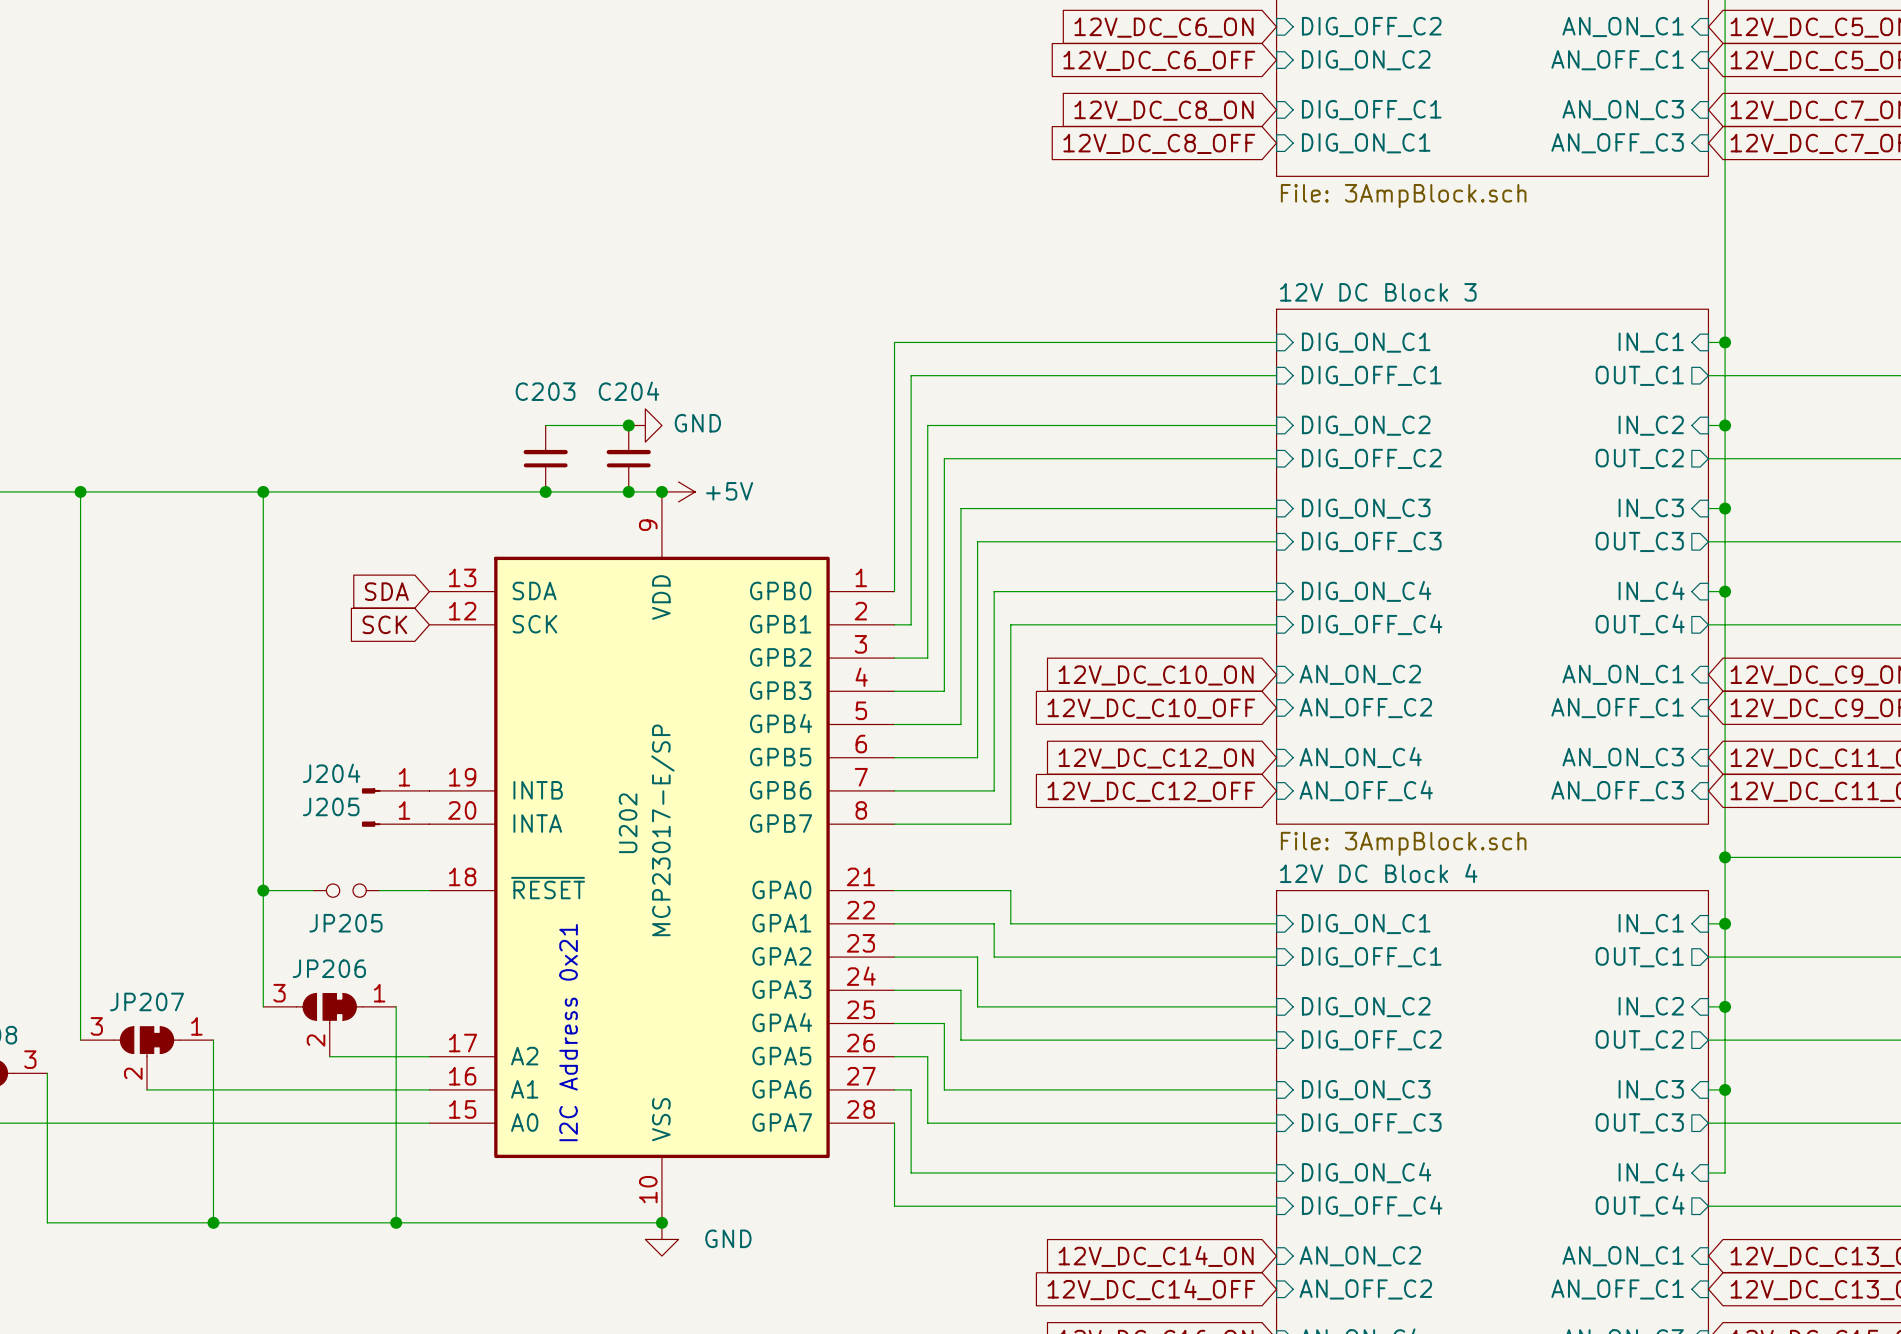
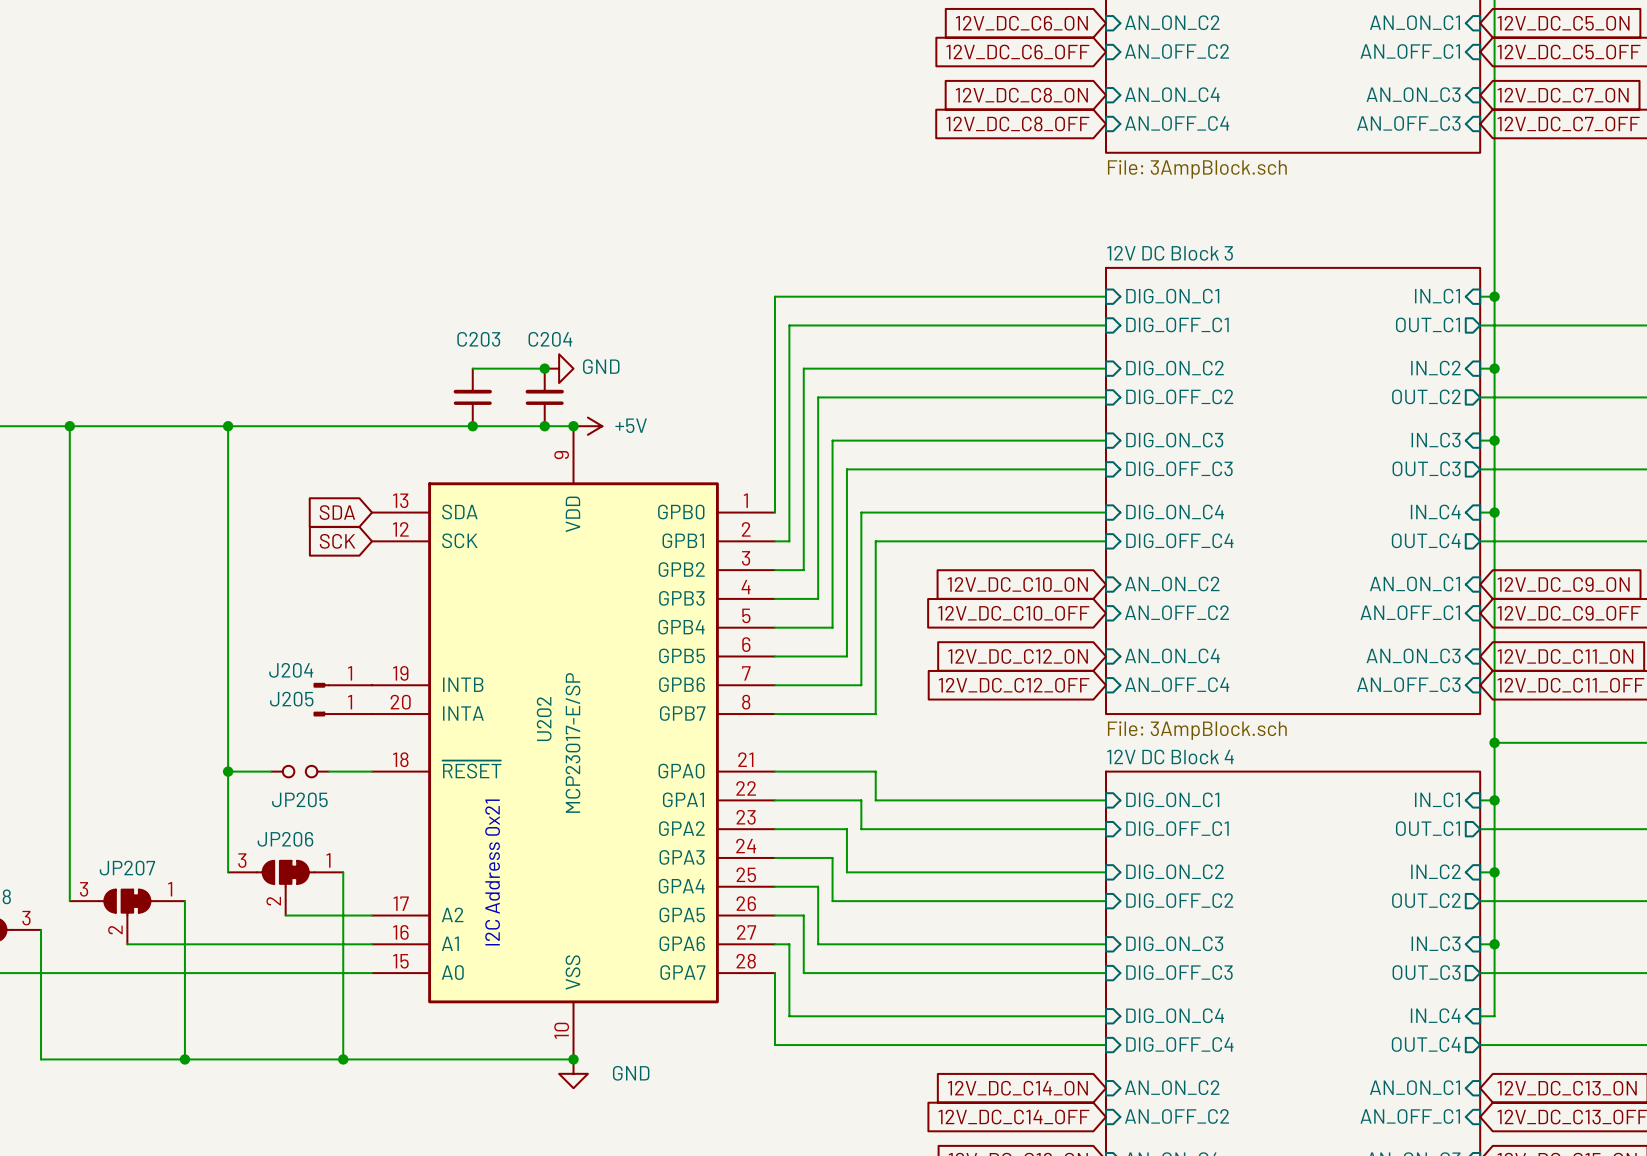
sheet pin: DIG_OFF_C2 (1371, 27) -> AN_ON_C2 (1172, 22)
sheet pin: DIG_ON_C2 (1366, 60) -> AN_OFF_C2 (1176, 51)
sheet pin: DIG_OFF_C1 (1371, 110) -> AN_ON_C4 (1172, 94)
sheet pin: DIG_ON_C1 (1366, 143) -> AN_OFF_C4 (1177, 123)

